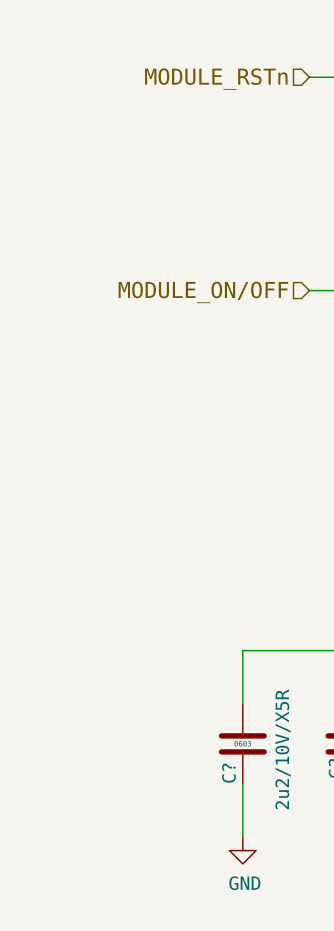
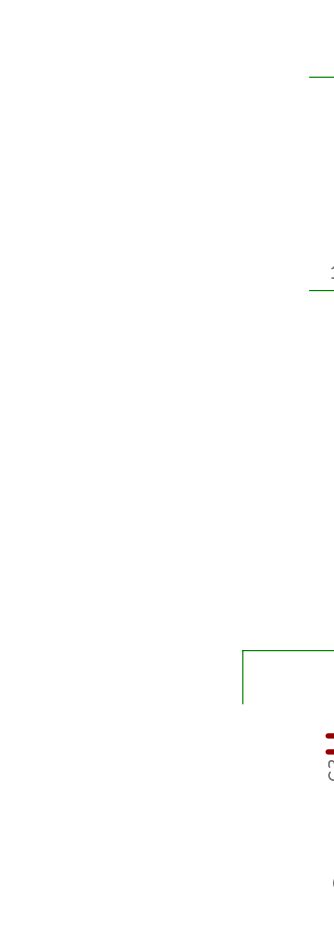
hierarchical label: MODULE_RSTn (216, 79) -> none
hierarchical label: MODULE_ON/OFF (203, 292) -> none
C?: 2u2/10V/X5R (242, 743) -> none
wire: (242, 783) (242, 837) -> none
power symbol: GND (242, 850) -> none

